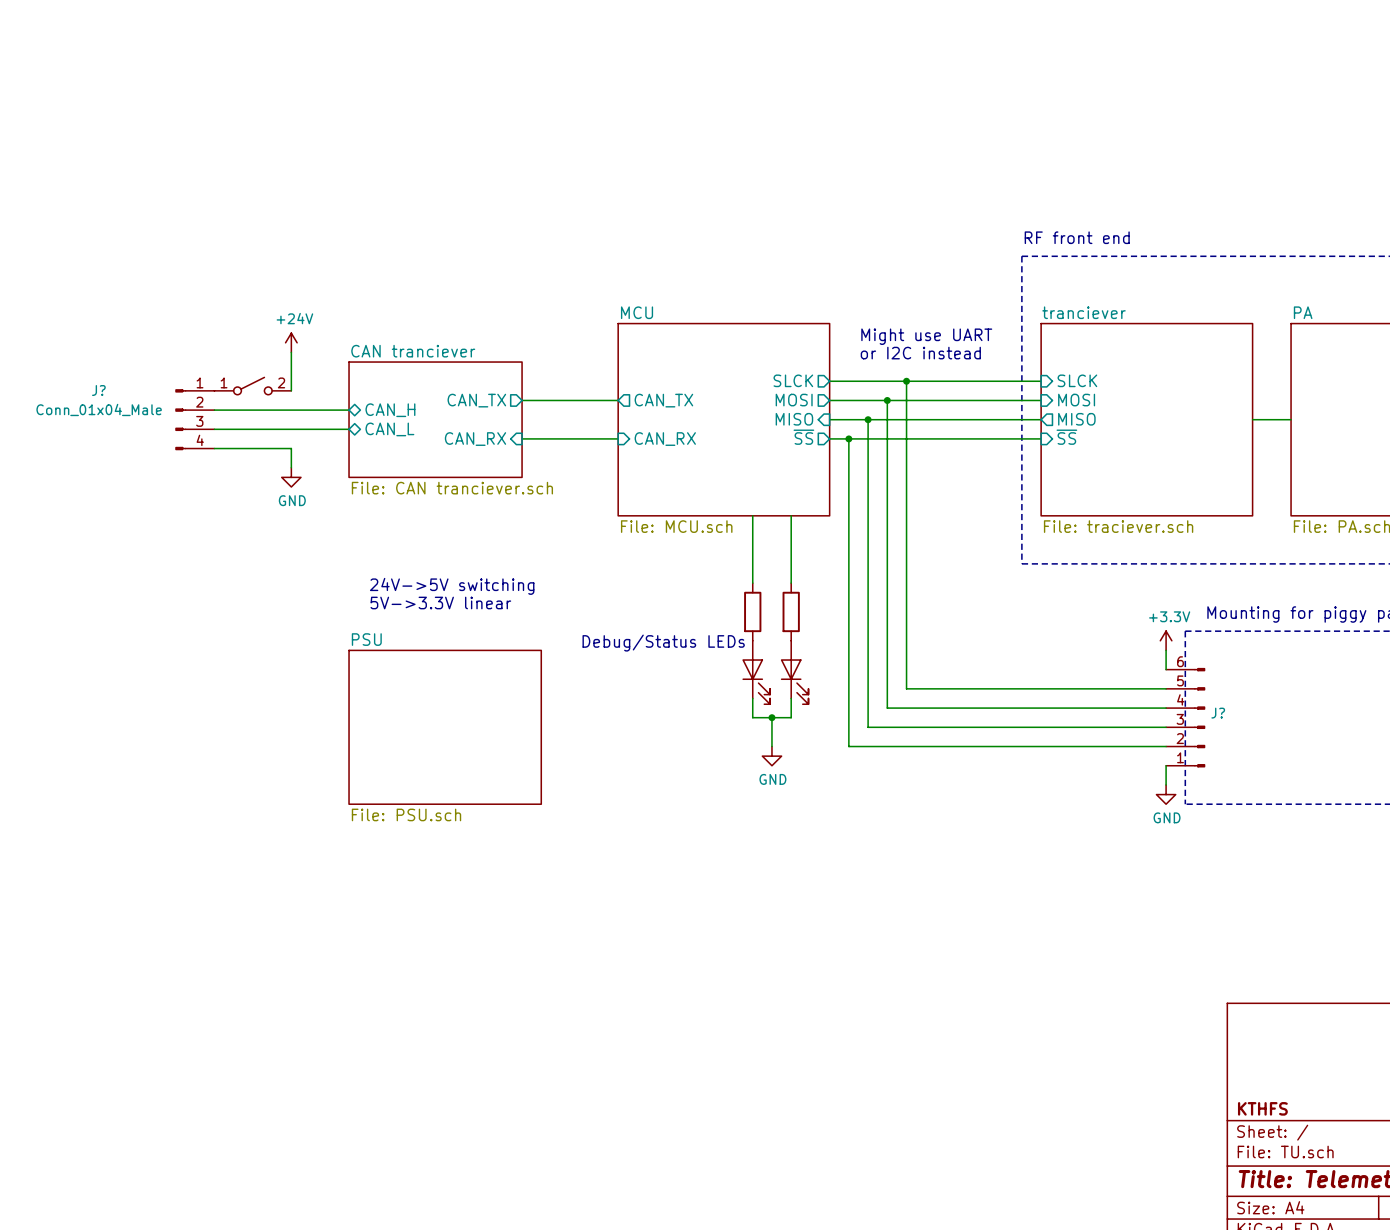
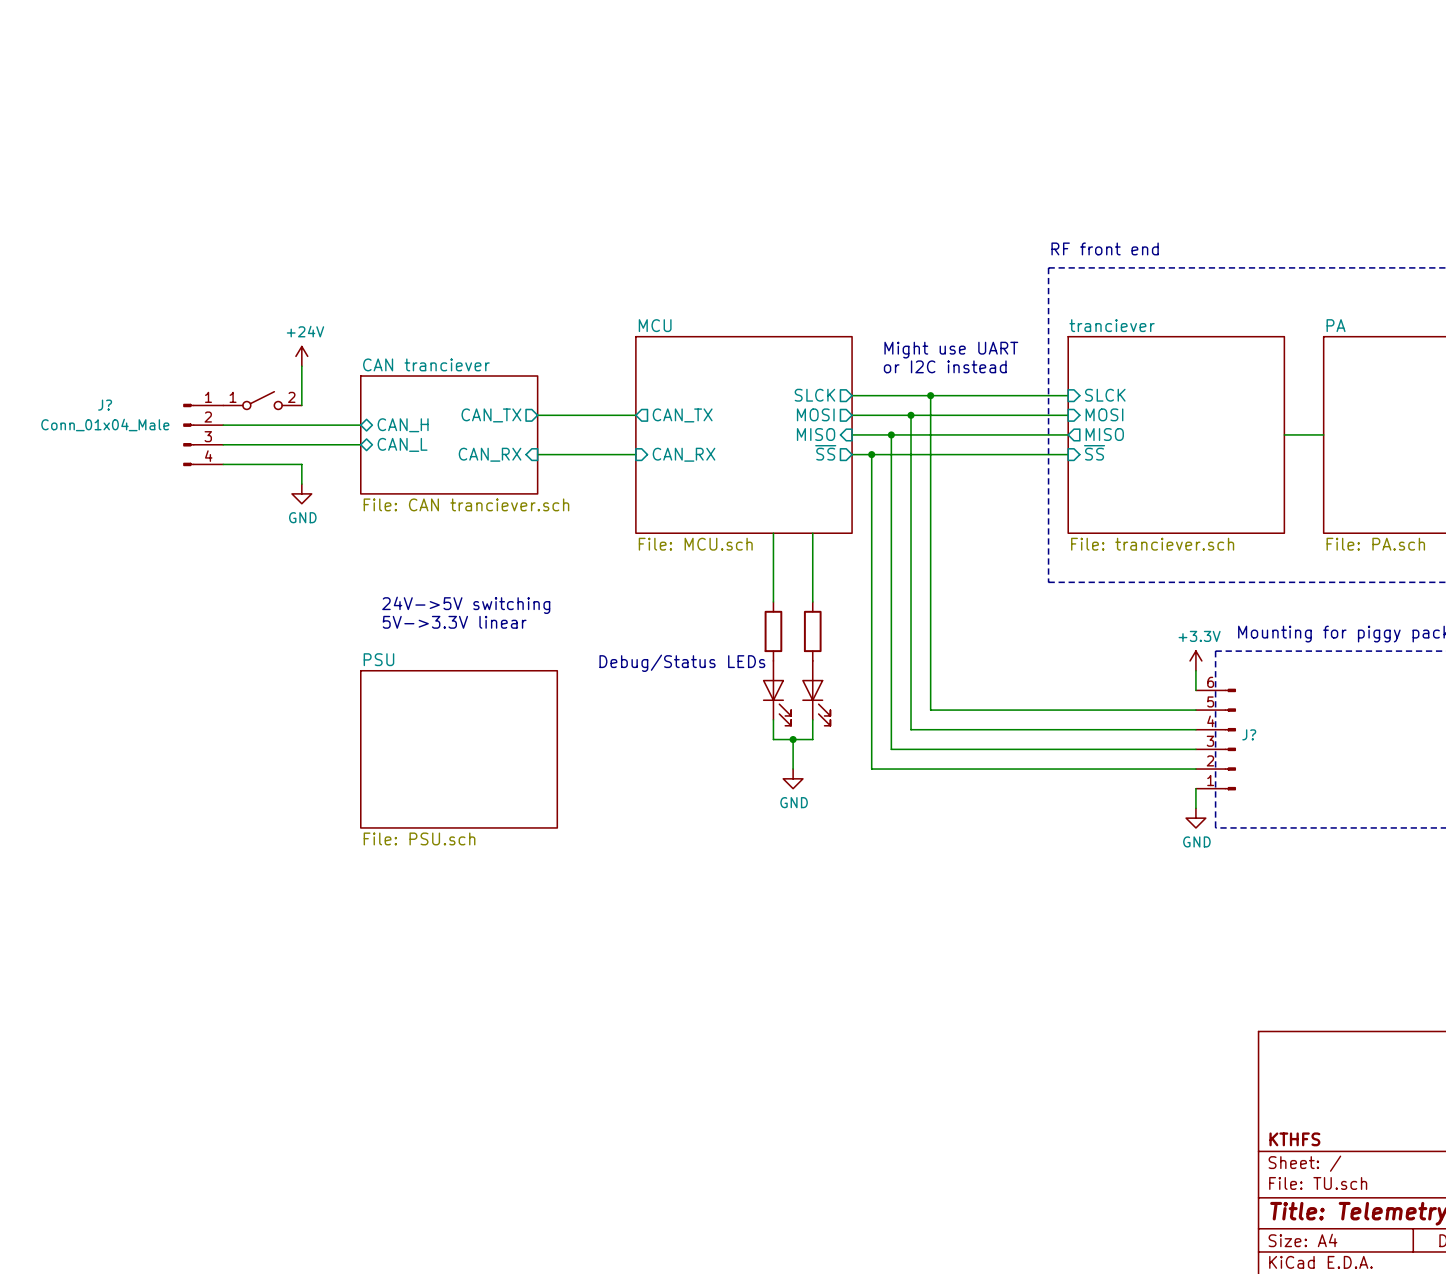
sheet tranciever value: File: traciever.sch (1118, 526) -> File: tranciever.sch (1152, 544)

